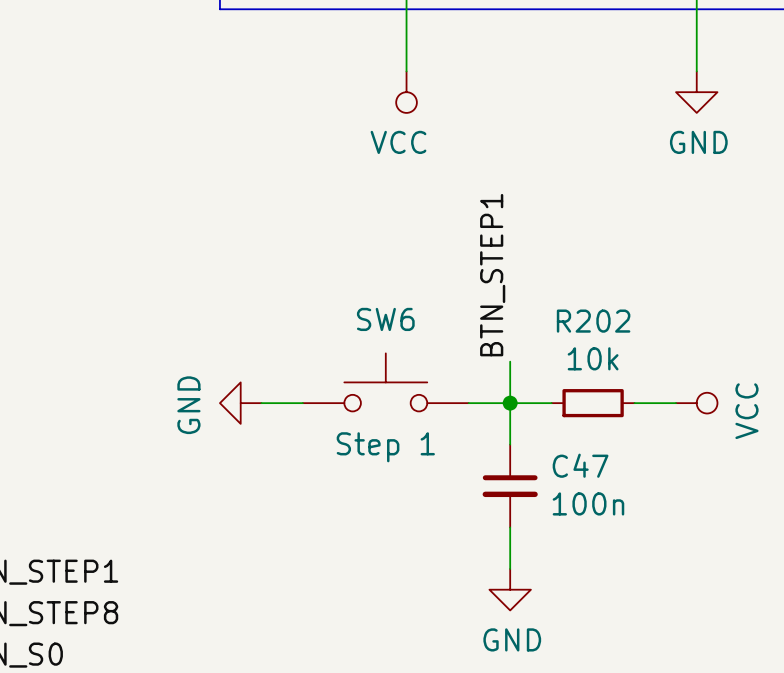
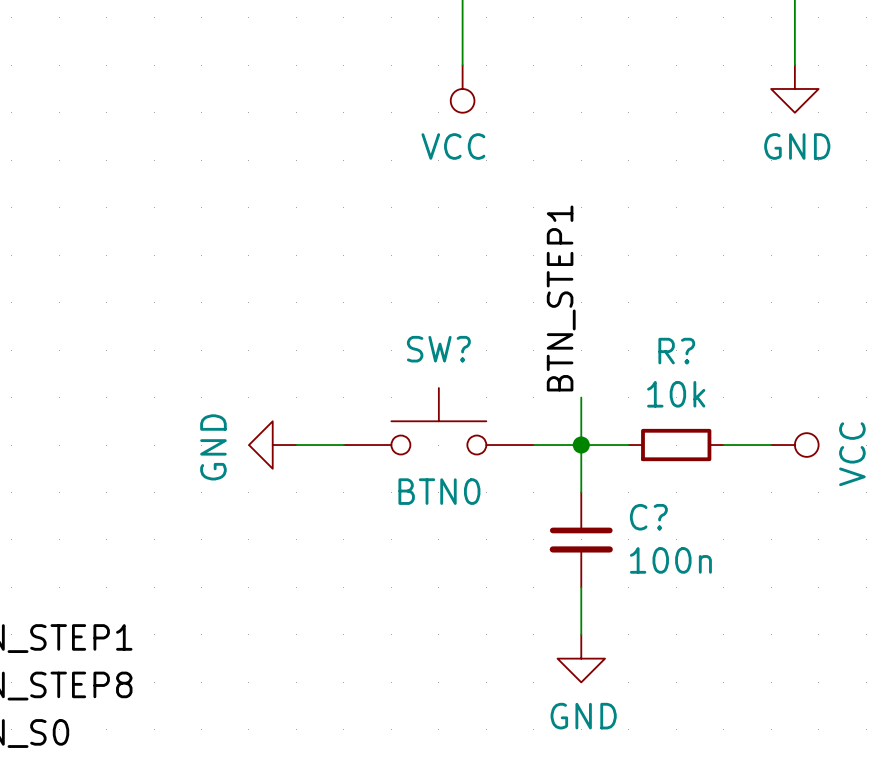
SW6 name: SW6 (385, 319) -> SW? (438, 349)
R202 name: R202 (593, 321) -> R? (676, 351)
SW6 value: Step 1 (385, 447) -> BTN0 (439, 491)
C47 name: C47 (580, 465) -> C? (648, 517)

